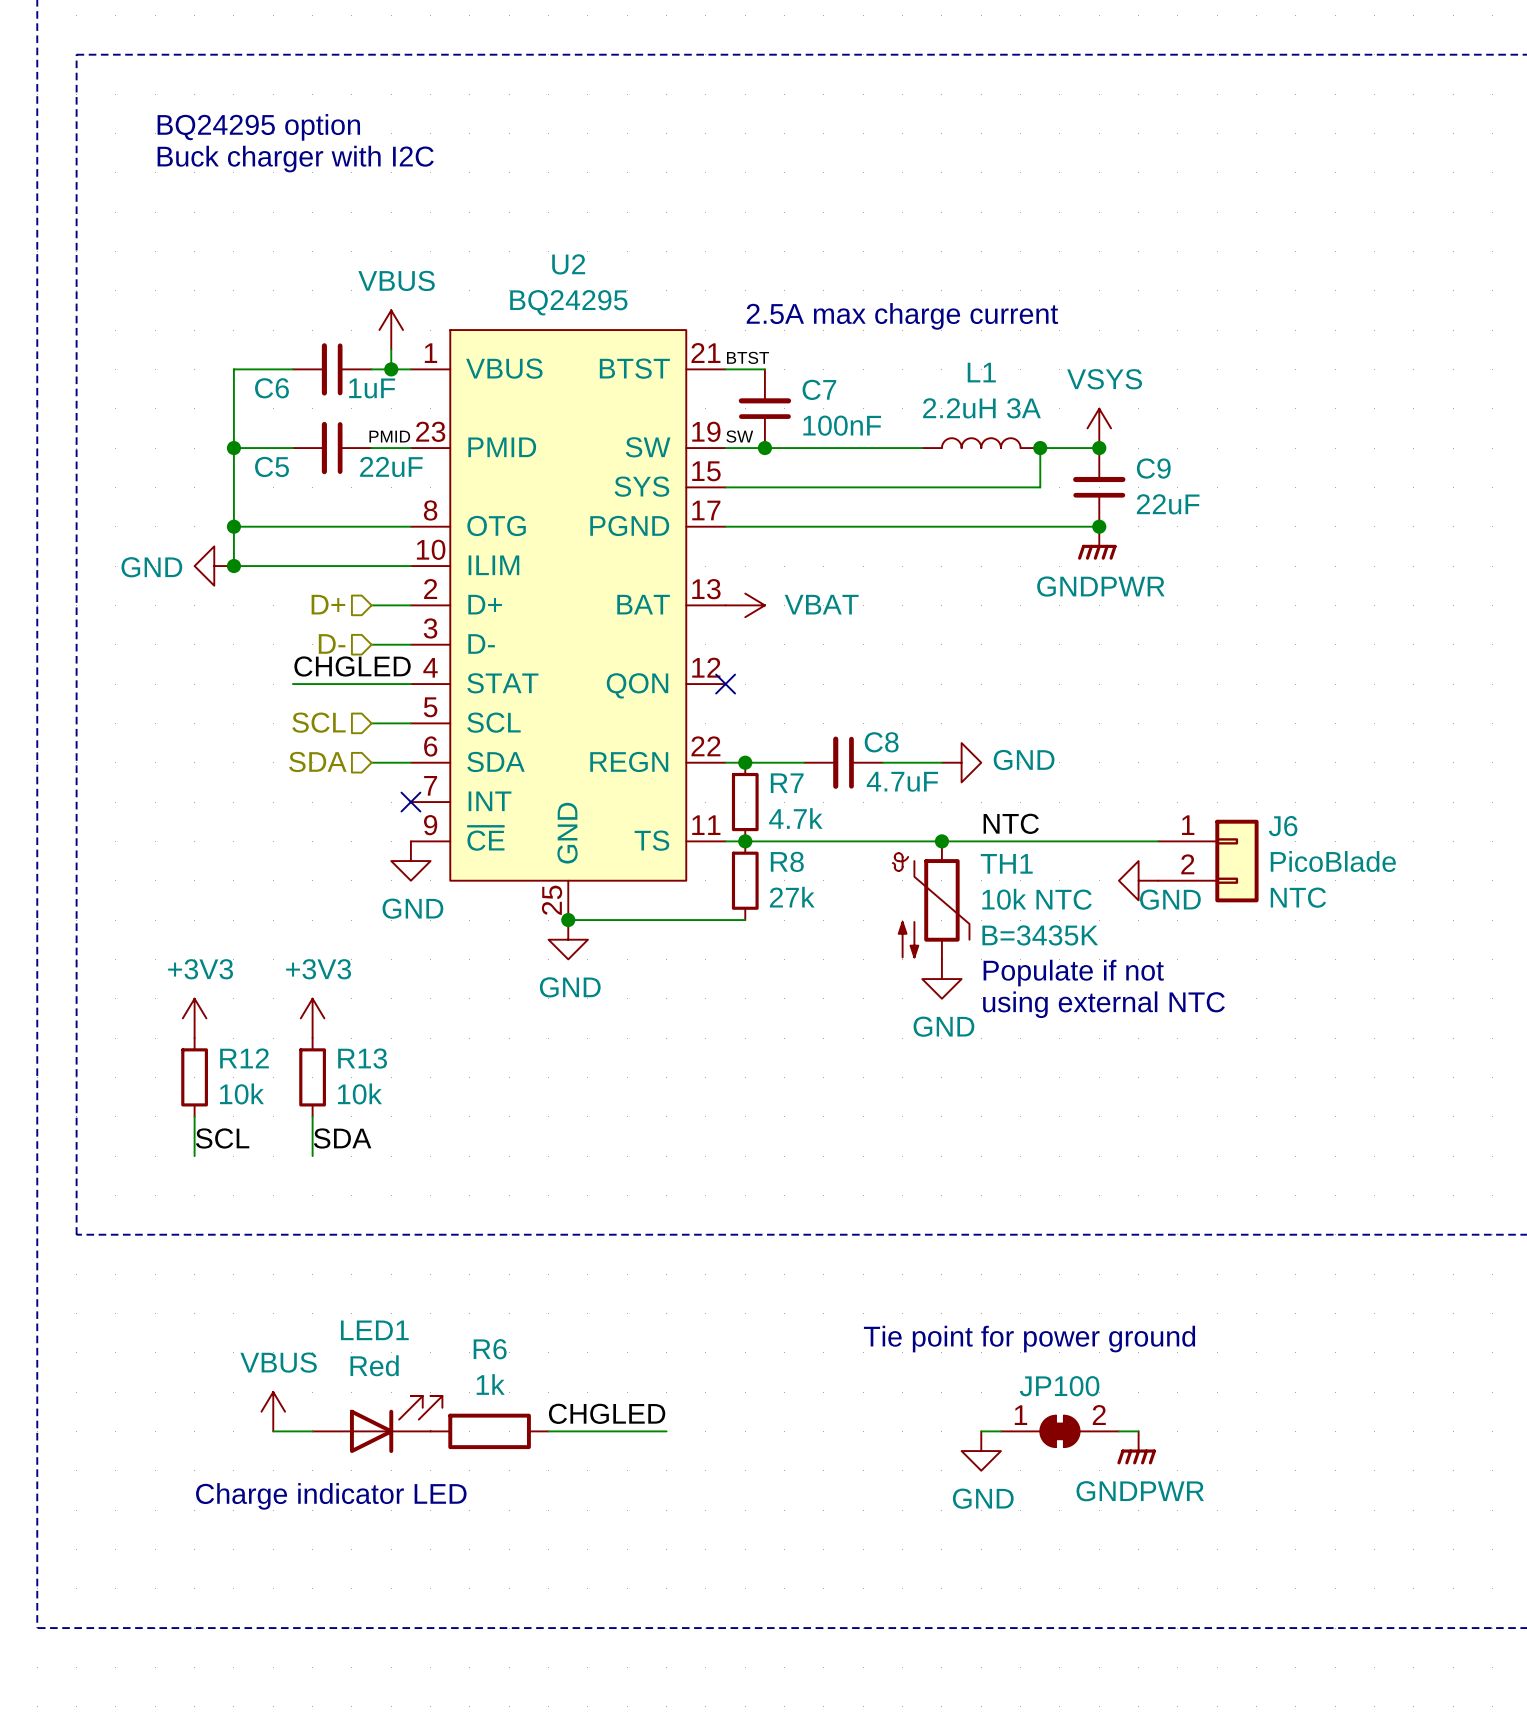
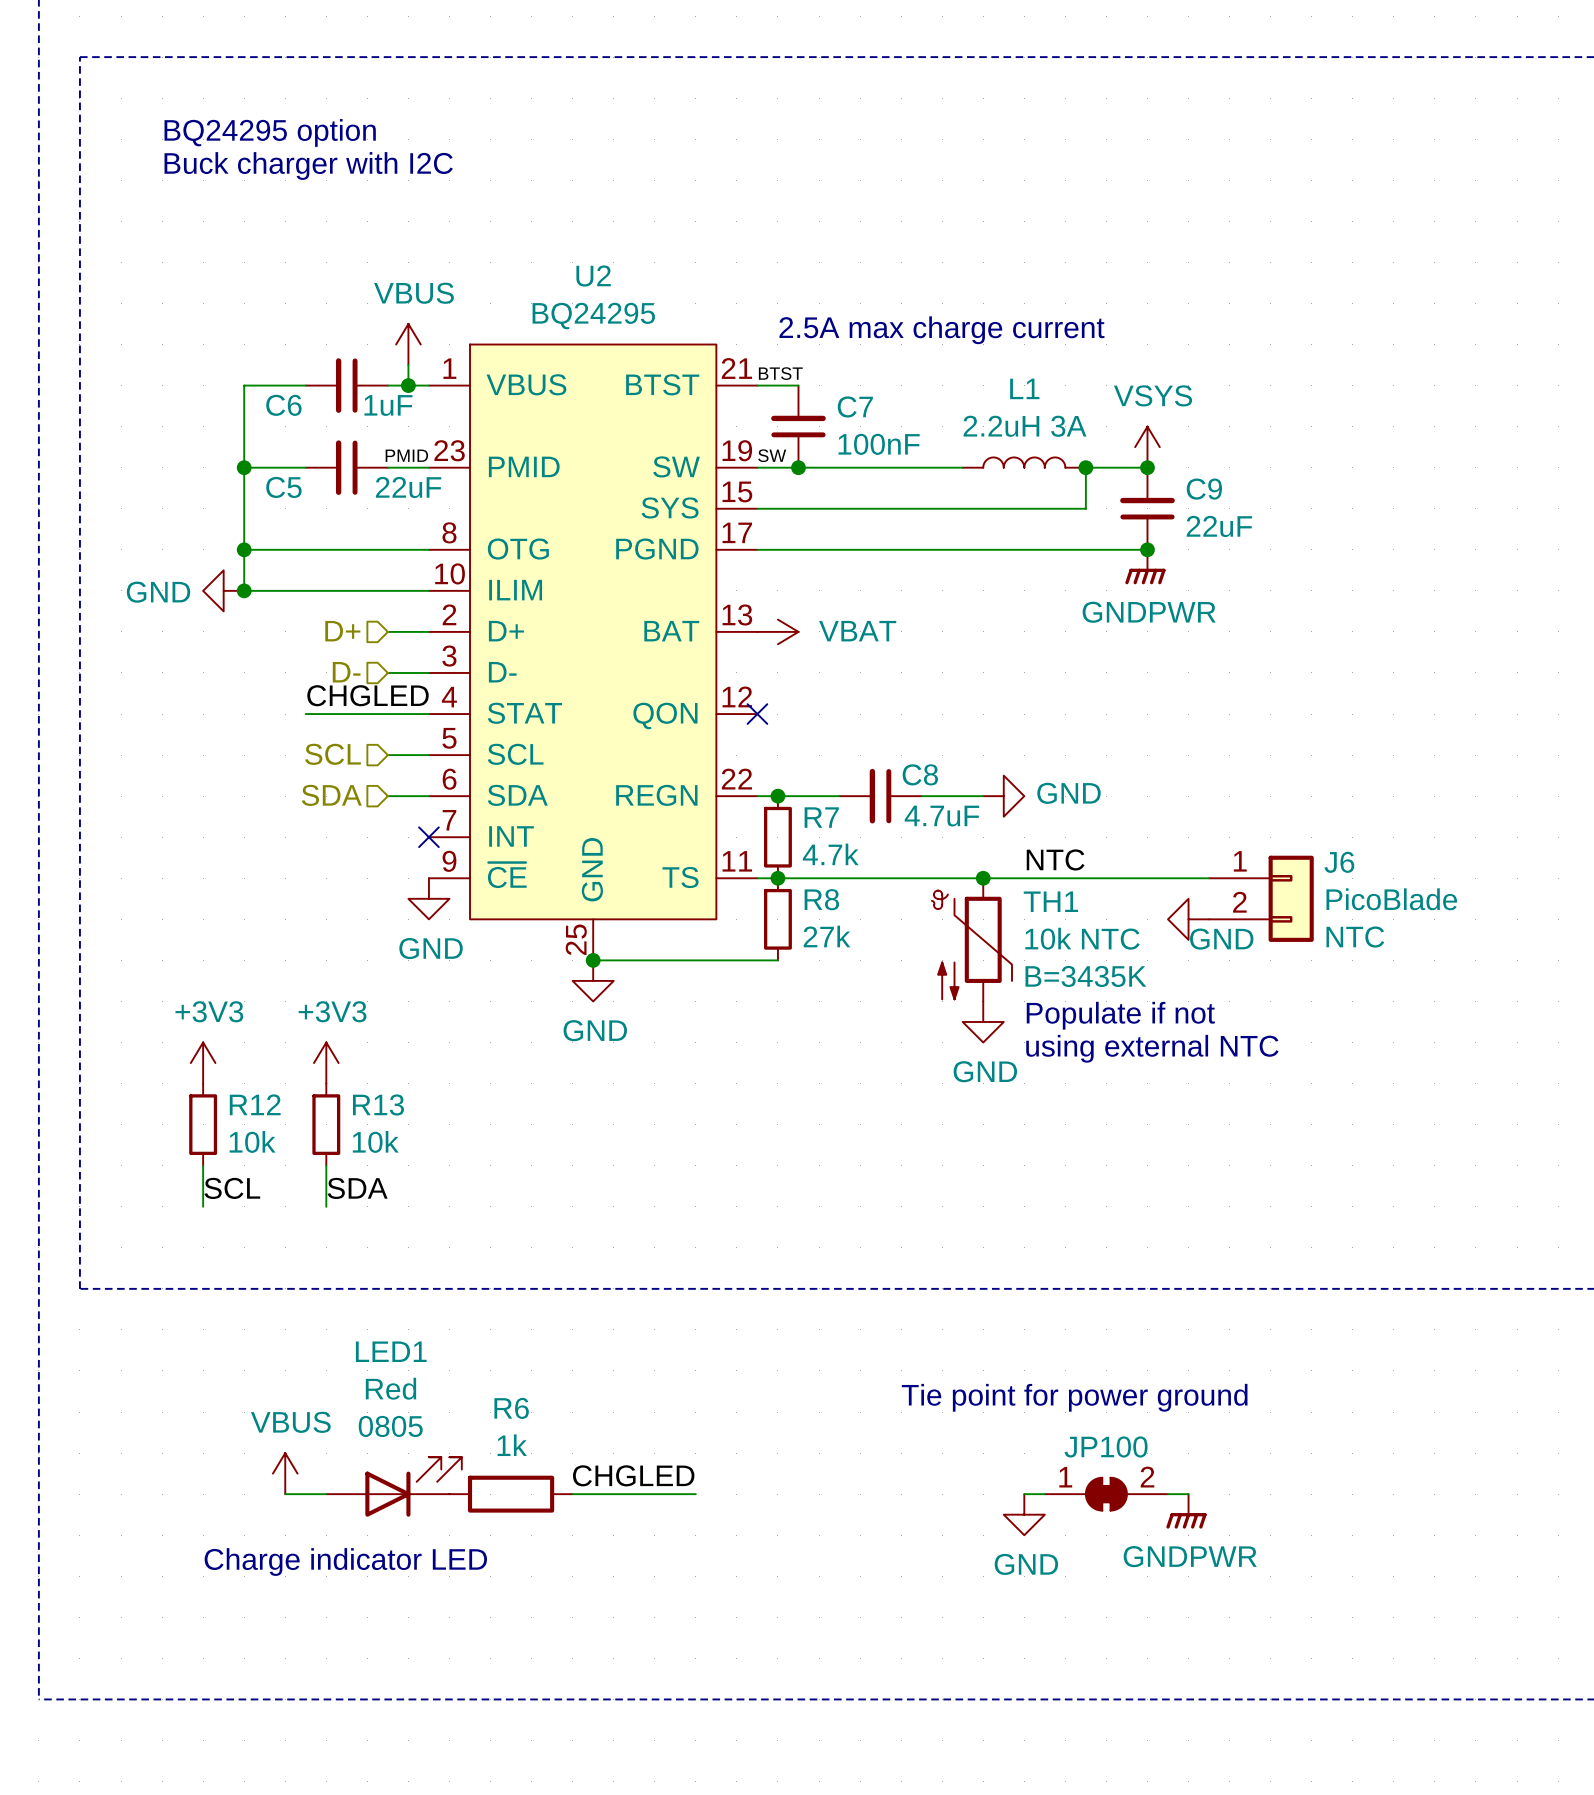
LED1 name position: LED1 (374, 1330) -> LED1 (391, 1351)
LED1 value position: Red (374, 1365) -> Red (391, 1388)
LED1 text: none -> 0805 (390, 1426)

